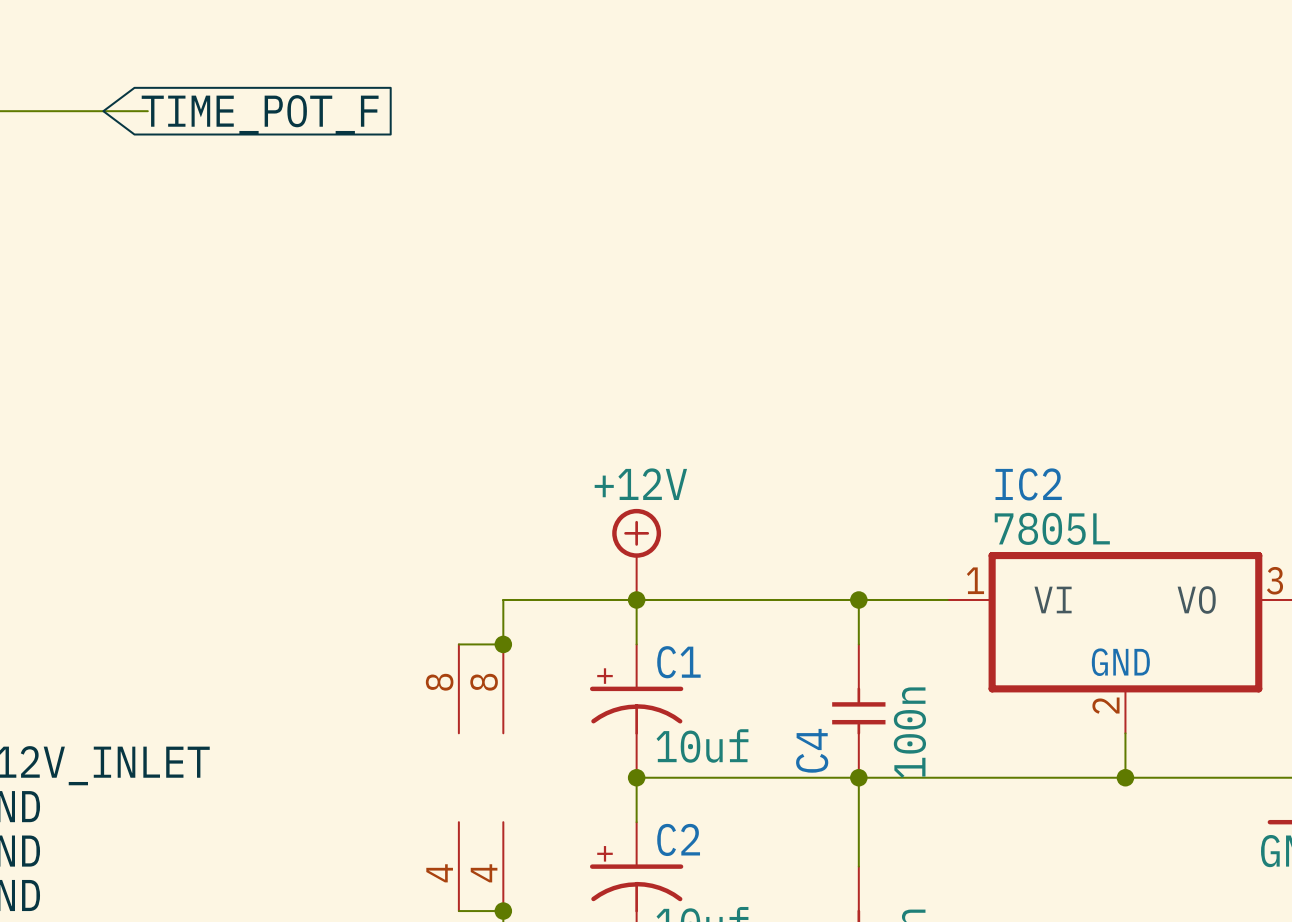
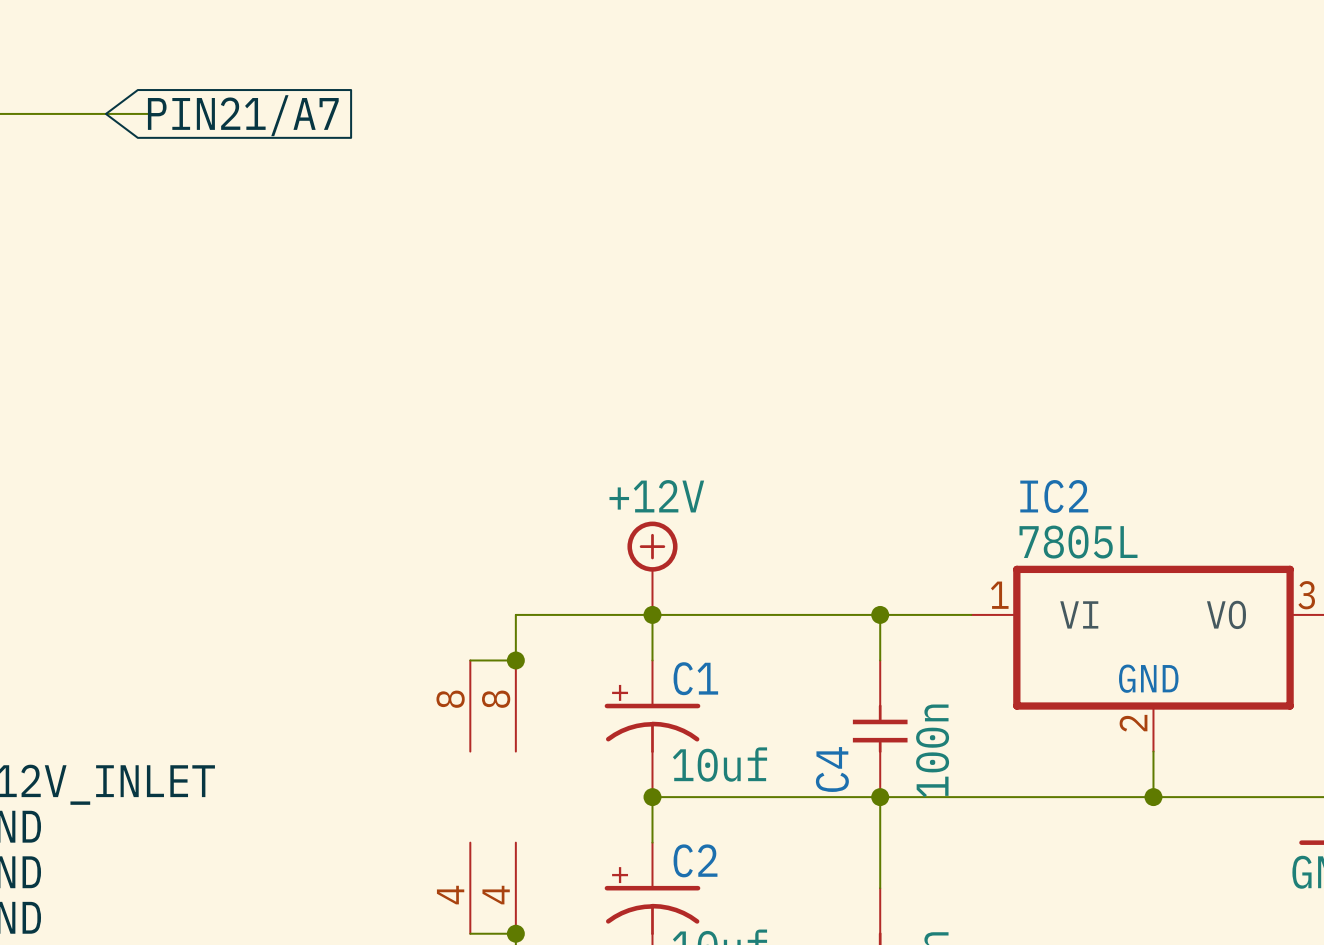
global label: TIME_POT_F (260, 114) -> PIN21/A7 (243, 115)

